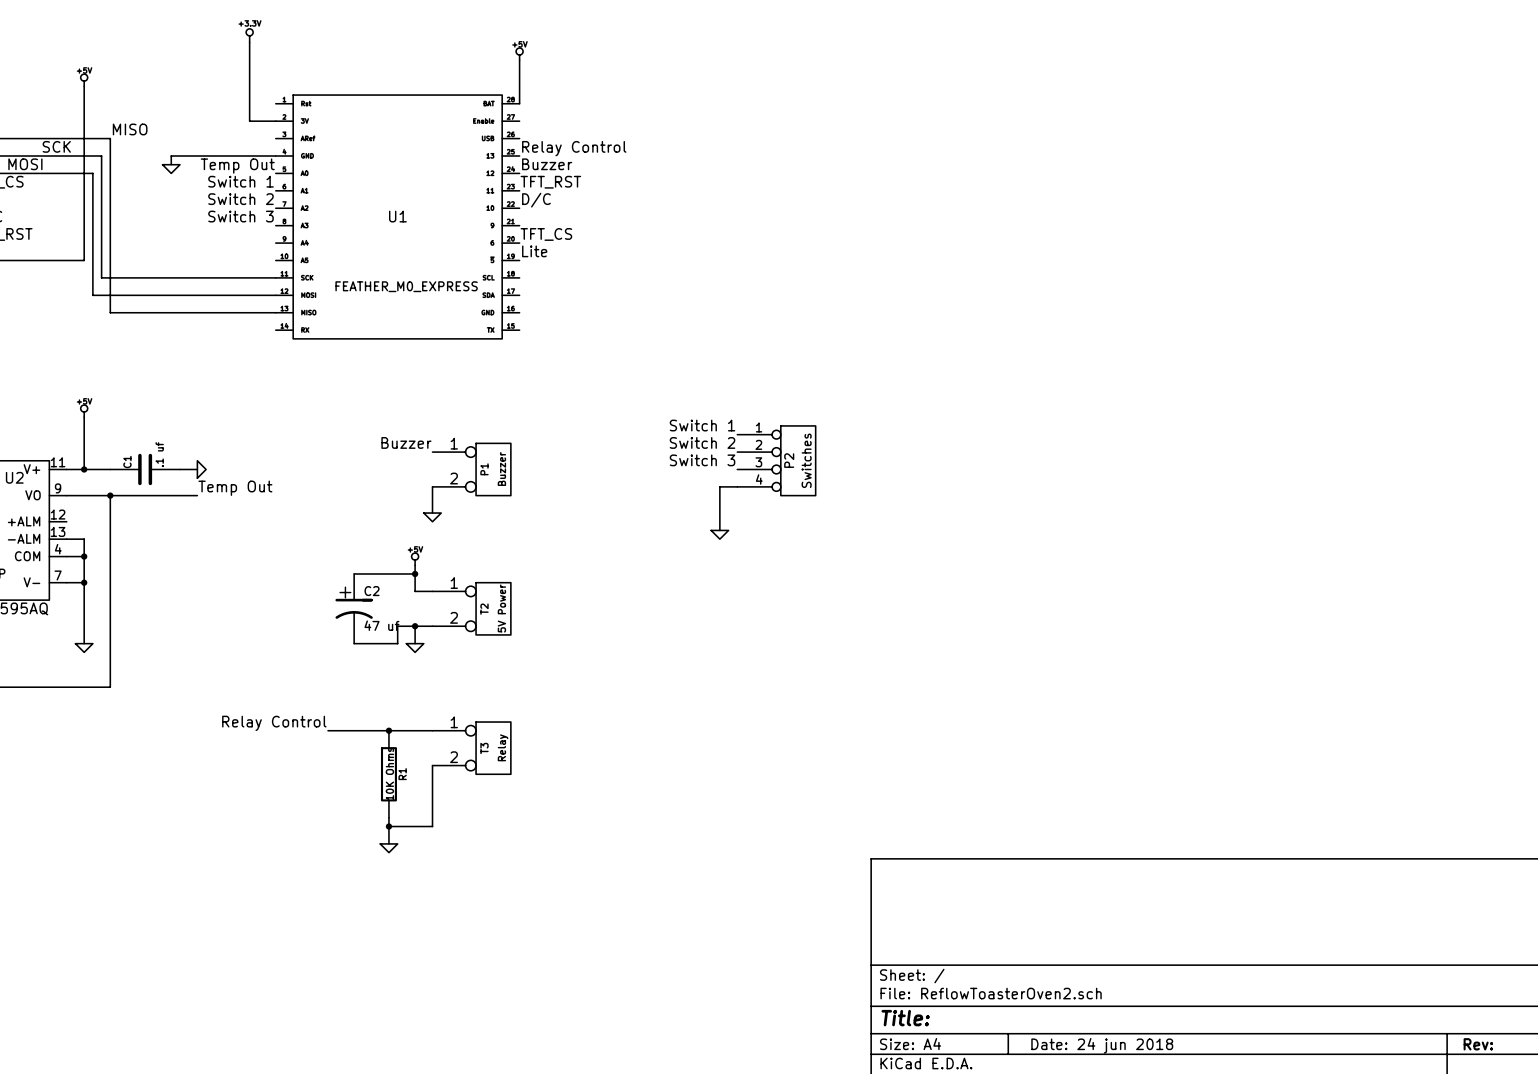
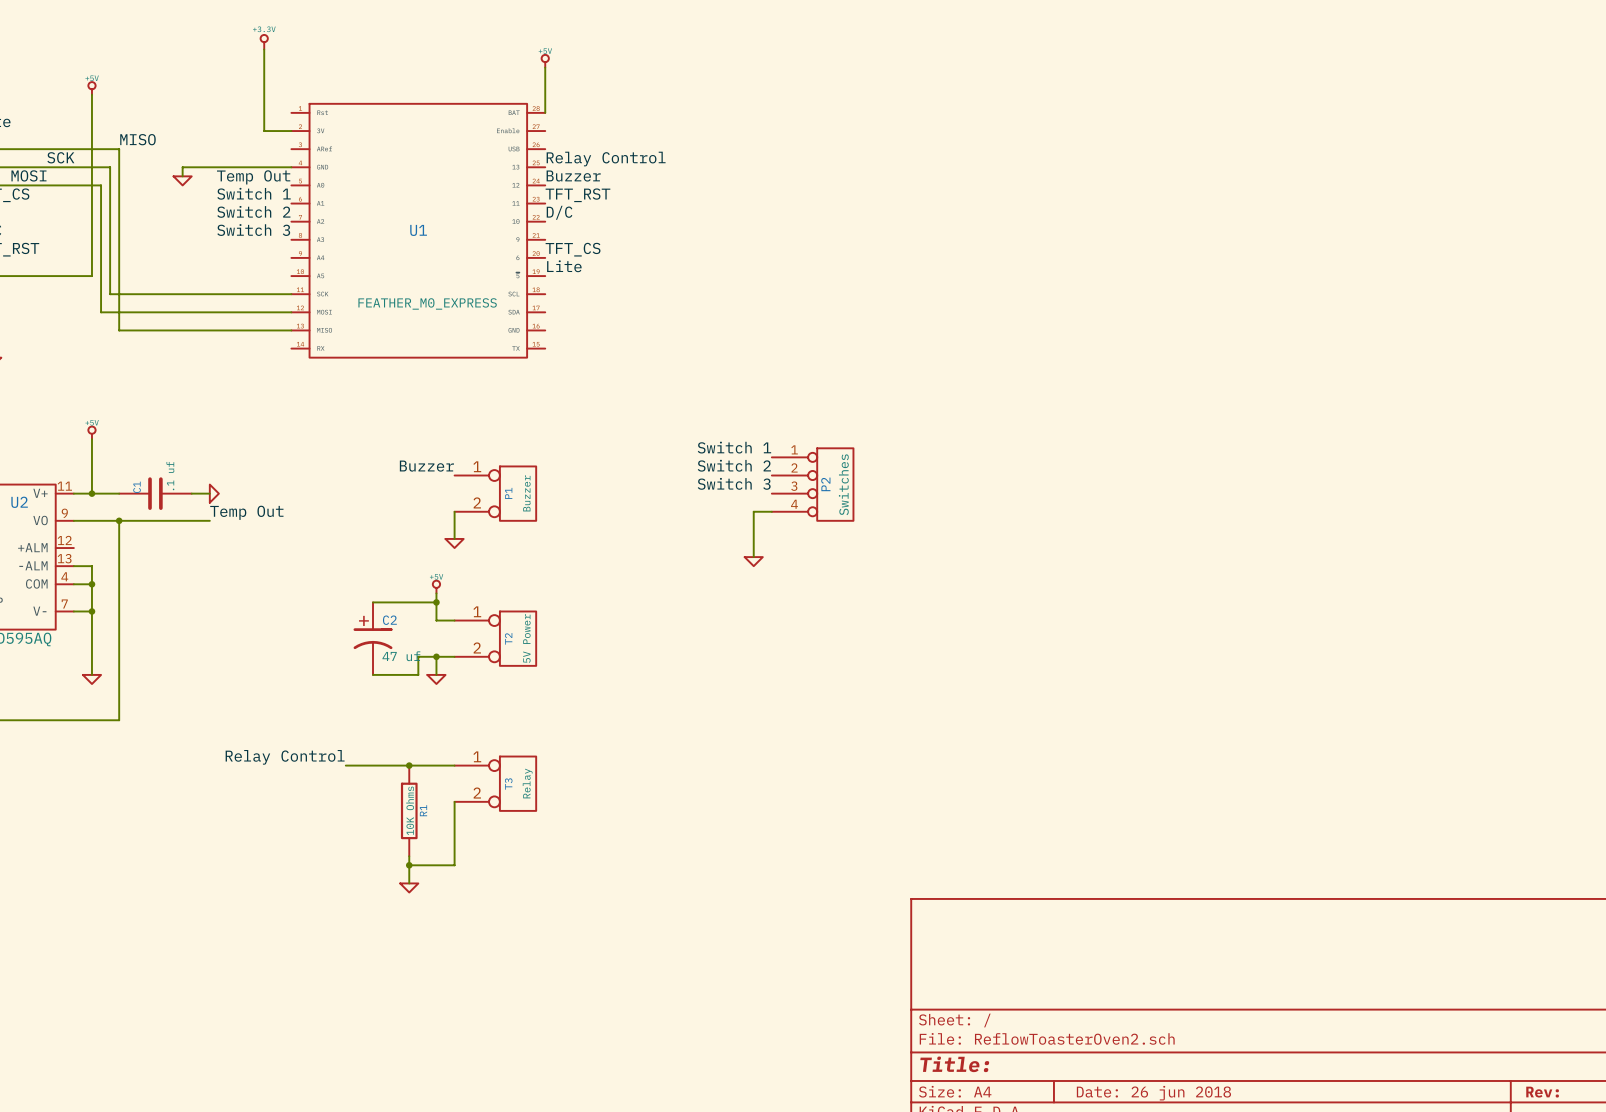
title block: Date: 24 jun 2018 (1102, 1045) -> Date: 26 jun 2018 (1153, 1093)

